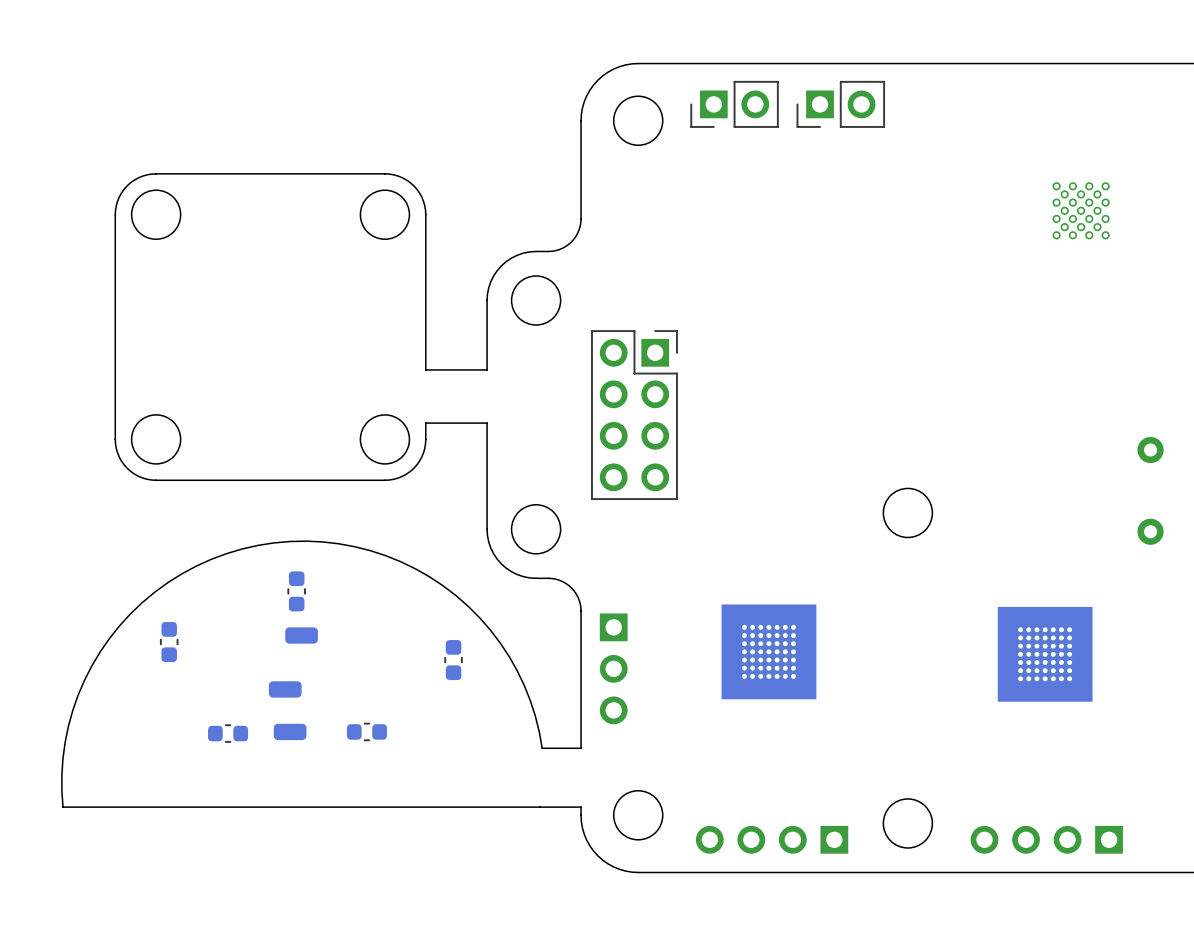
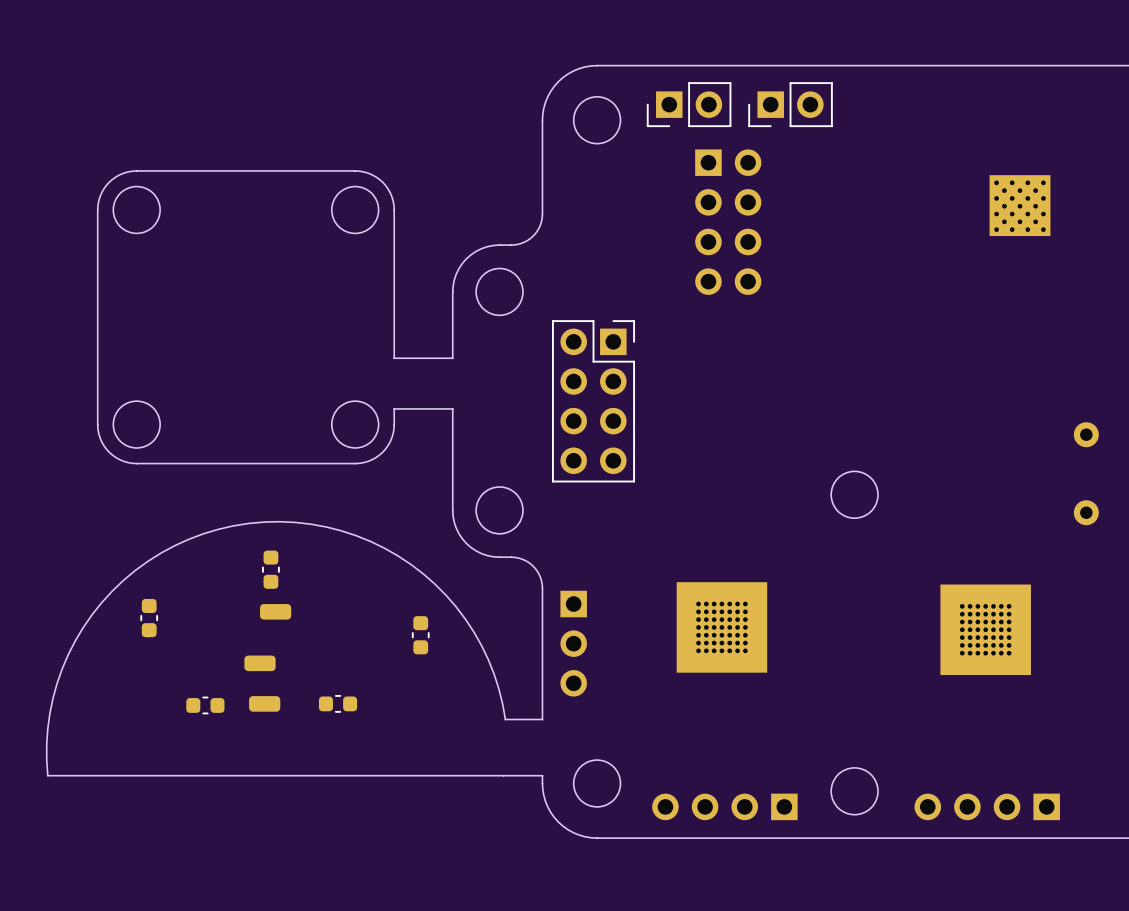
part footprint: [1052, 182, 1110, 240] -> [989, 175, 1051, 237]
part: none -> (728, 222)

